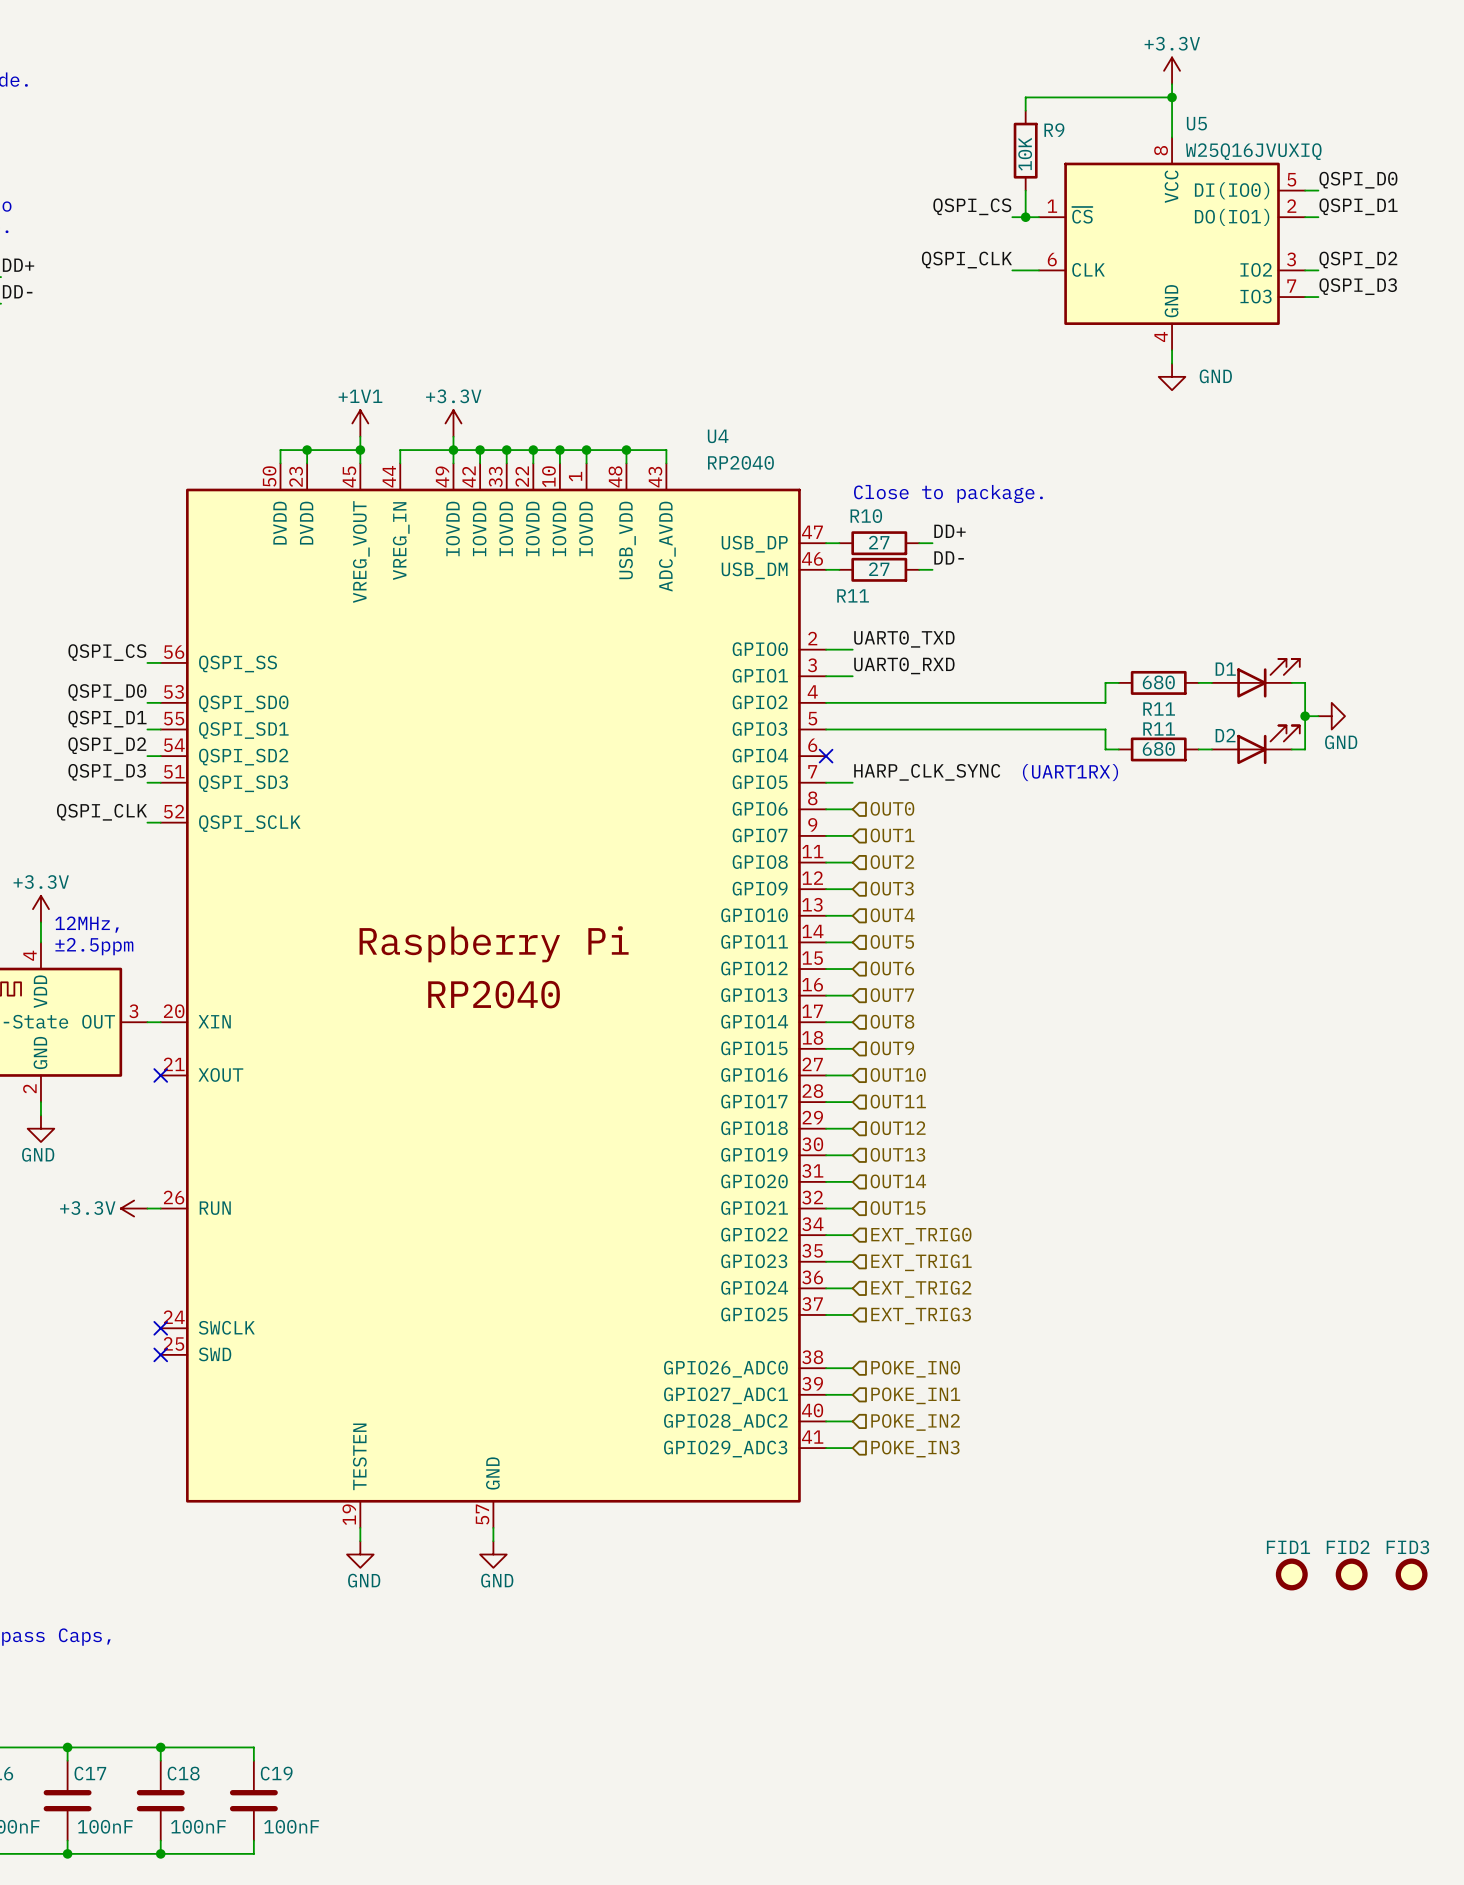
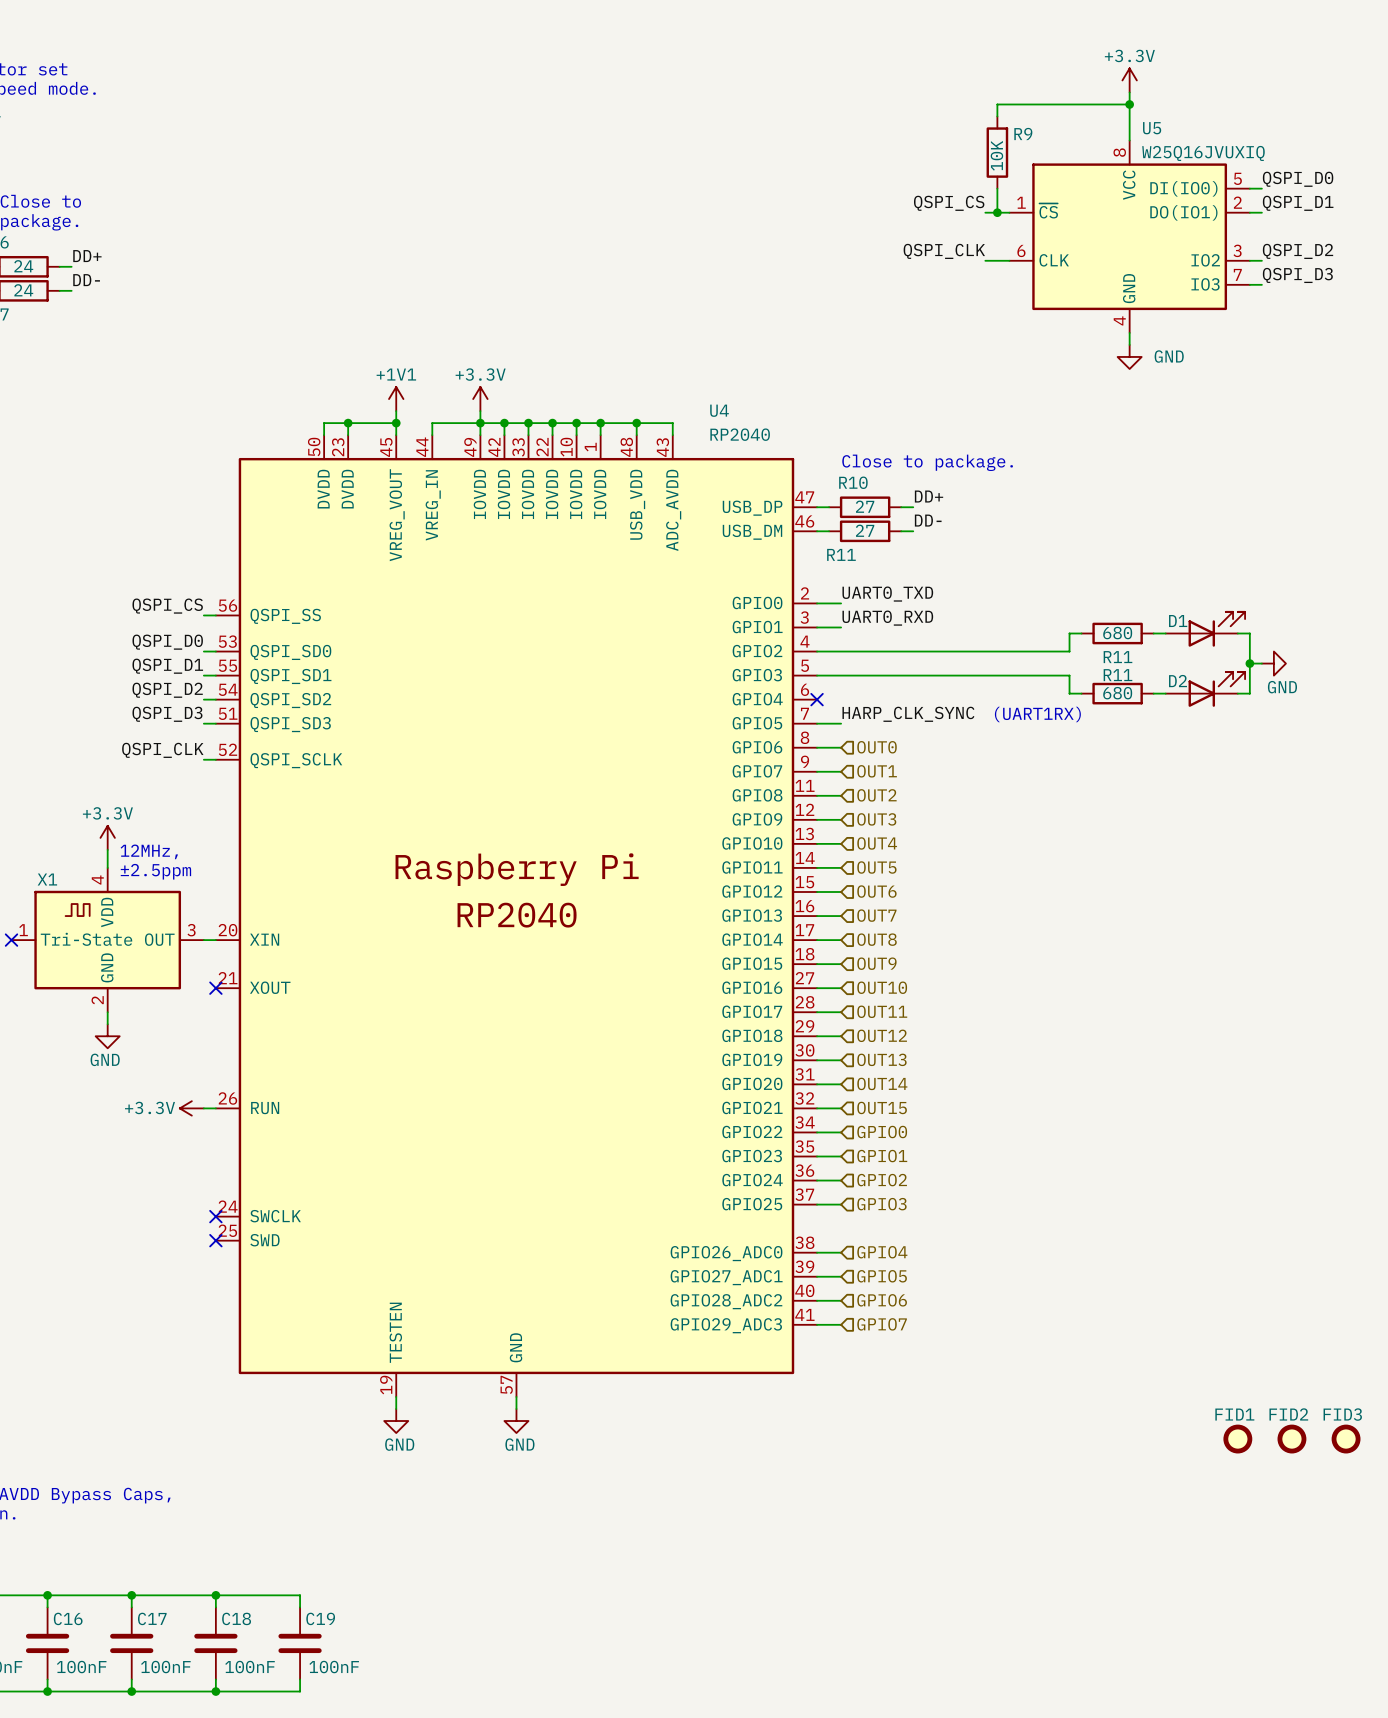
hierarchical label: EXT_TRIG0 (921, 1236) -> GPIO0 (882, 1132)
hierarchical label: EXT_TRIG1 (921, 1262) -> GPIO1 (882, 1156)
hierarchical label: EXT_TRIG2 (921, 1289) -> GPIO2 (882, 1180)
hierarchical label: EXT_TRIG3 (921, 1315) -> GPIO3 (881, 1204)
hierarchical label: POKE_IN0 (915, 1369) -> GPIO4 (882, 1252)
hierarchical label: POKE_IN1 (915, 1395) -> GPIO5 (882, 1276)
hierarchical label: POKE_IN2 (915, 1422) -> GPIO6 (882, 1300)
hierarchical label: POKE_IN3 (915, 1449) -> GPIO7 (882, 1324)

